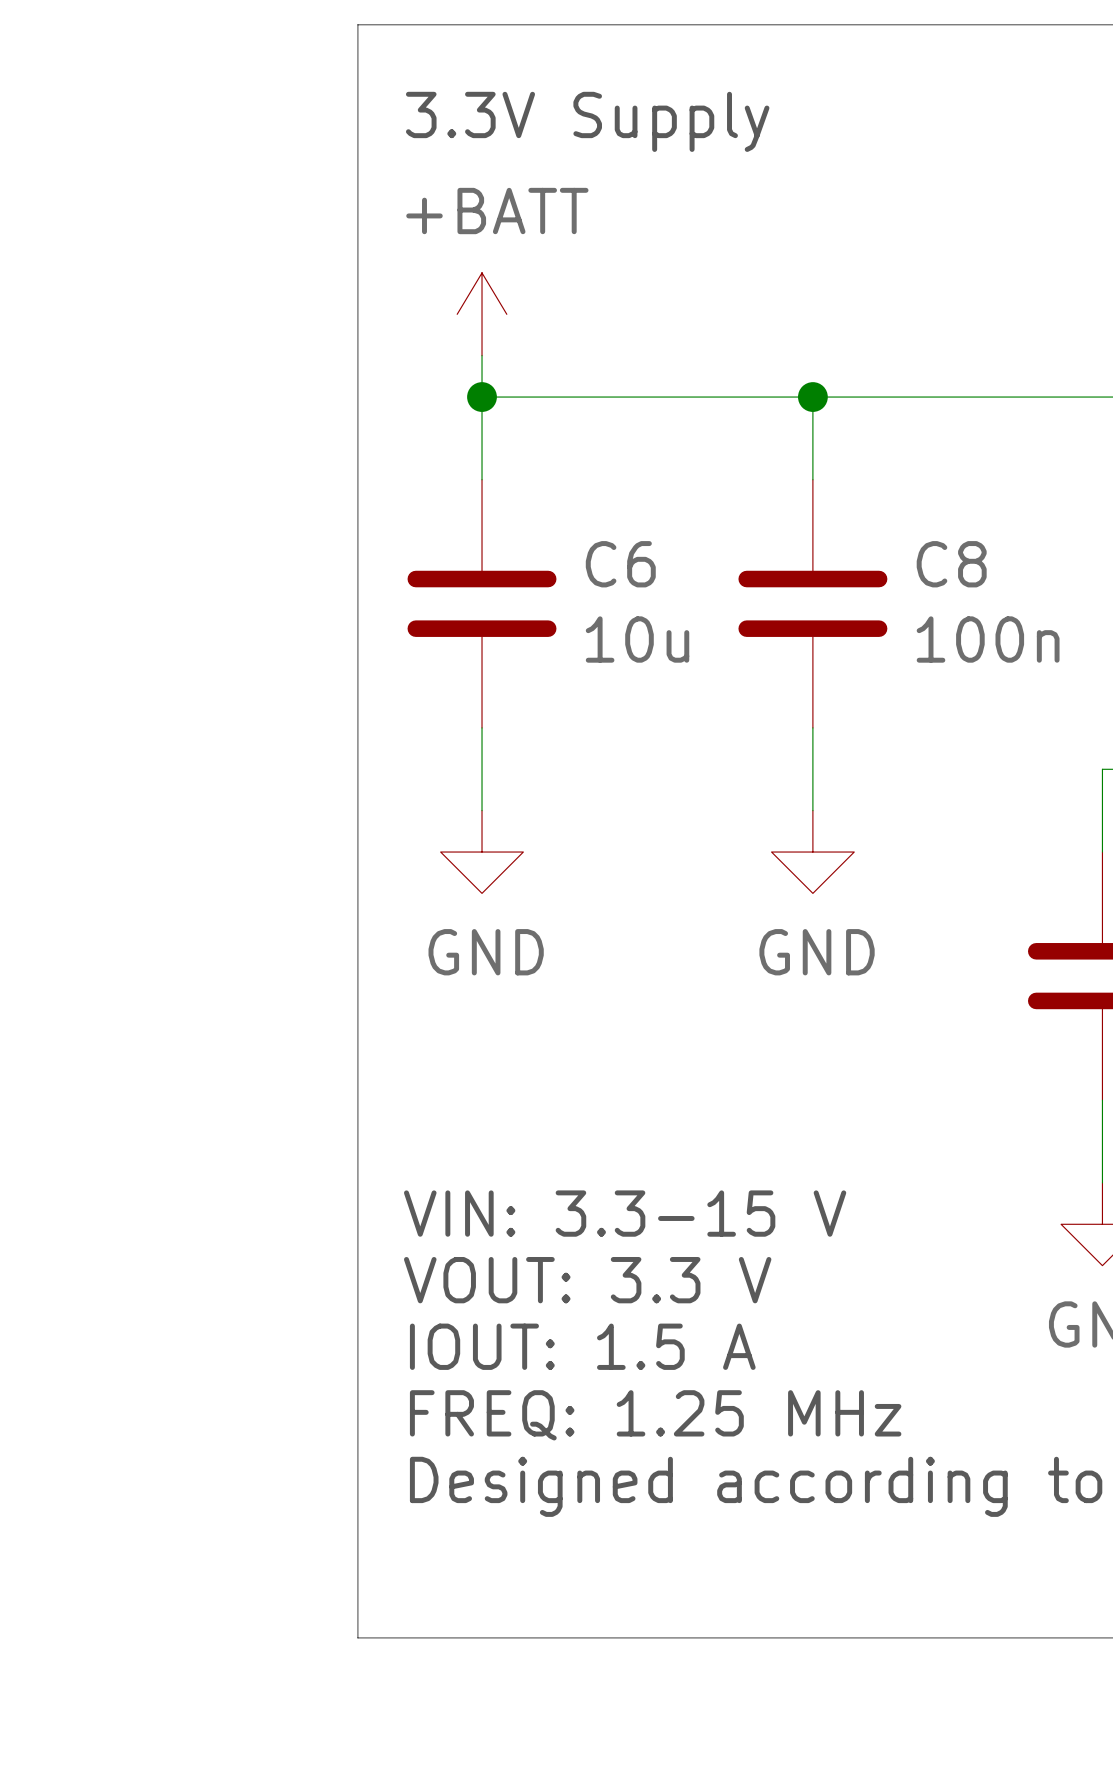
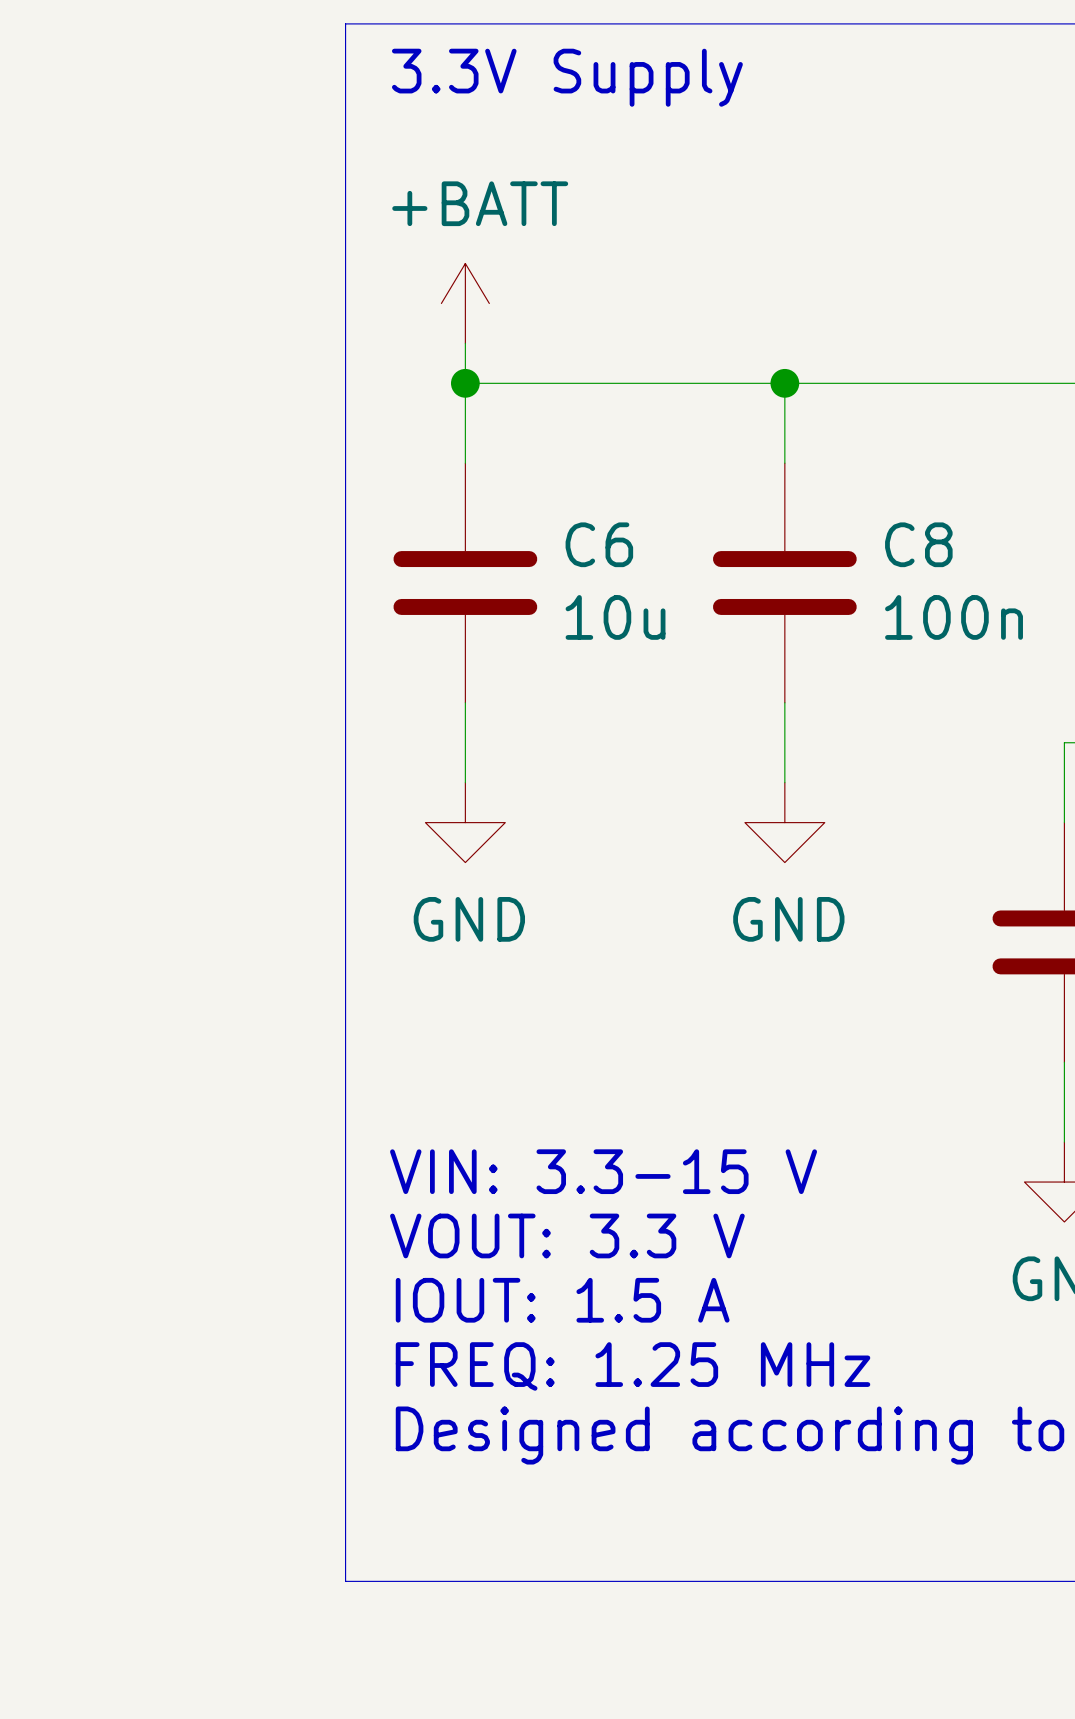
text position: 3.3V Supply (587, 121) -> 3.3V Supply (567, 77)

